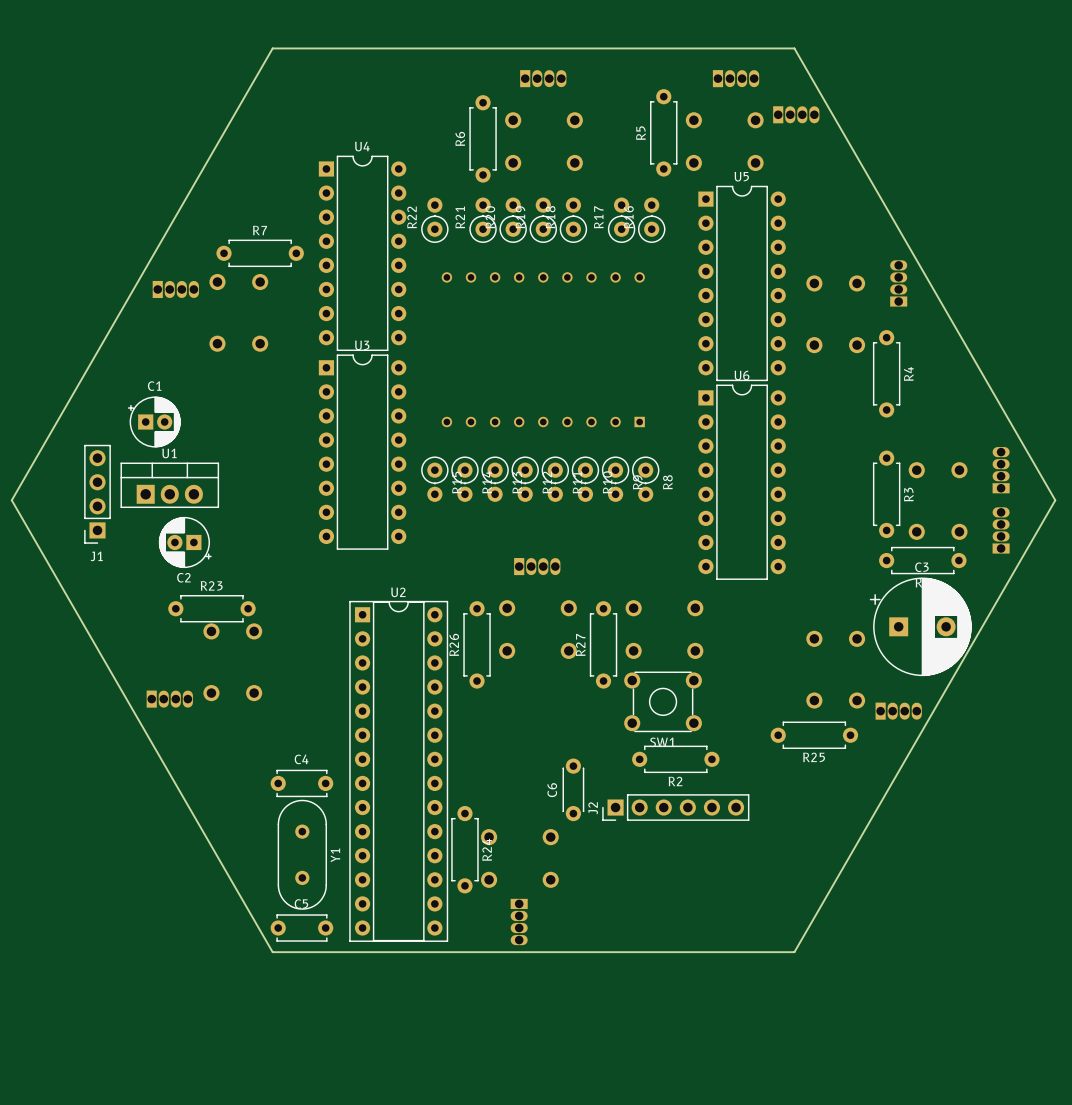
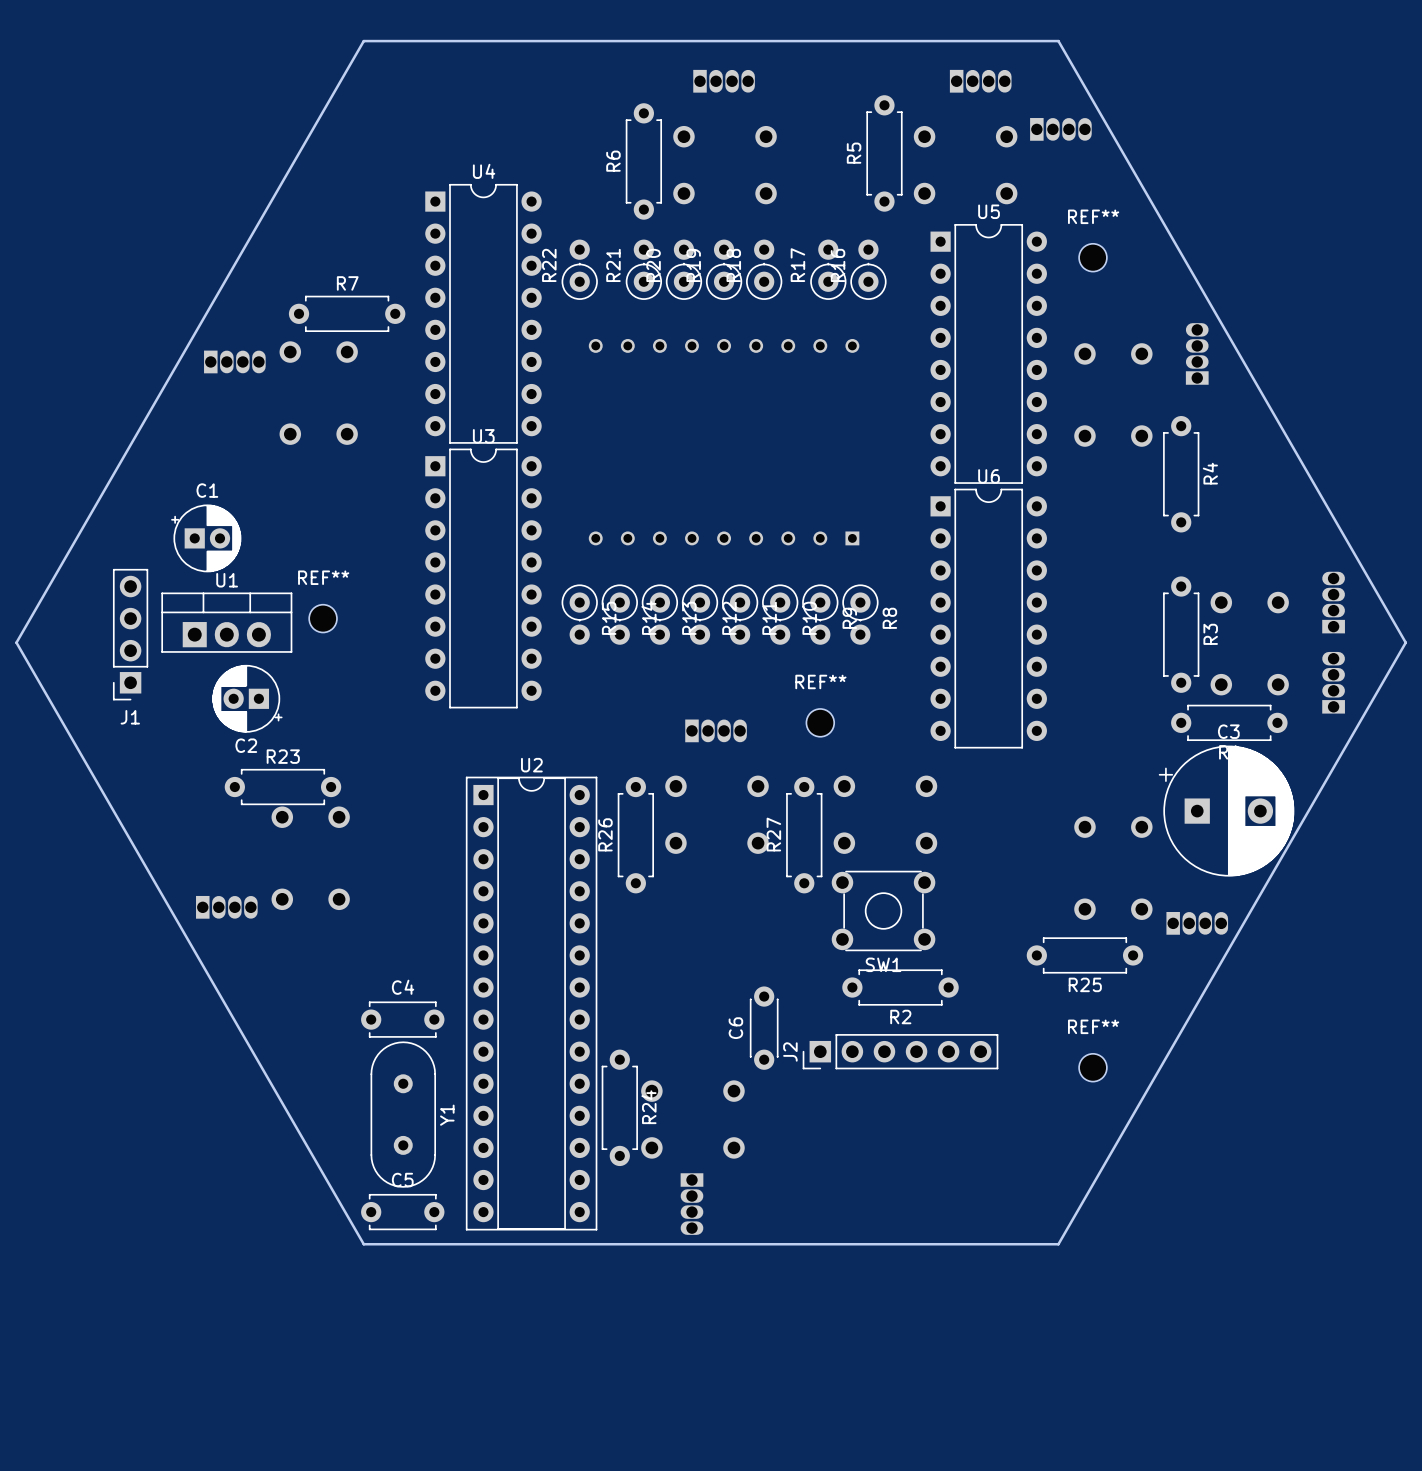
REF**: none -> (1092, 257)
REF**: none -> (323, 618)
REF**: none -> (820, 722)
REF**: none -> (1092, 1067)

